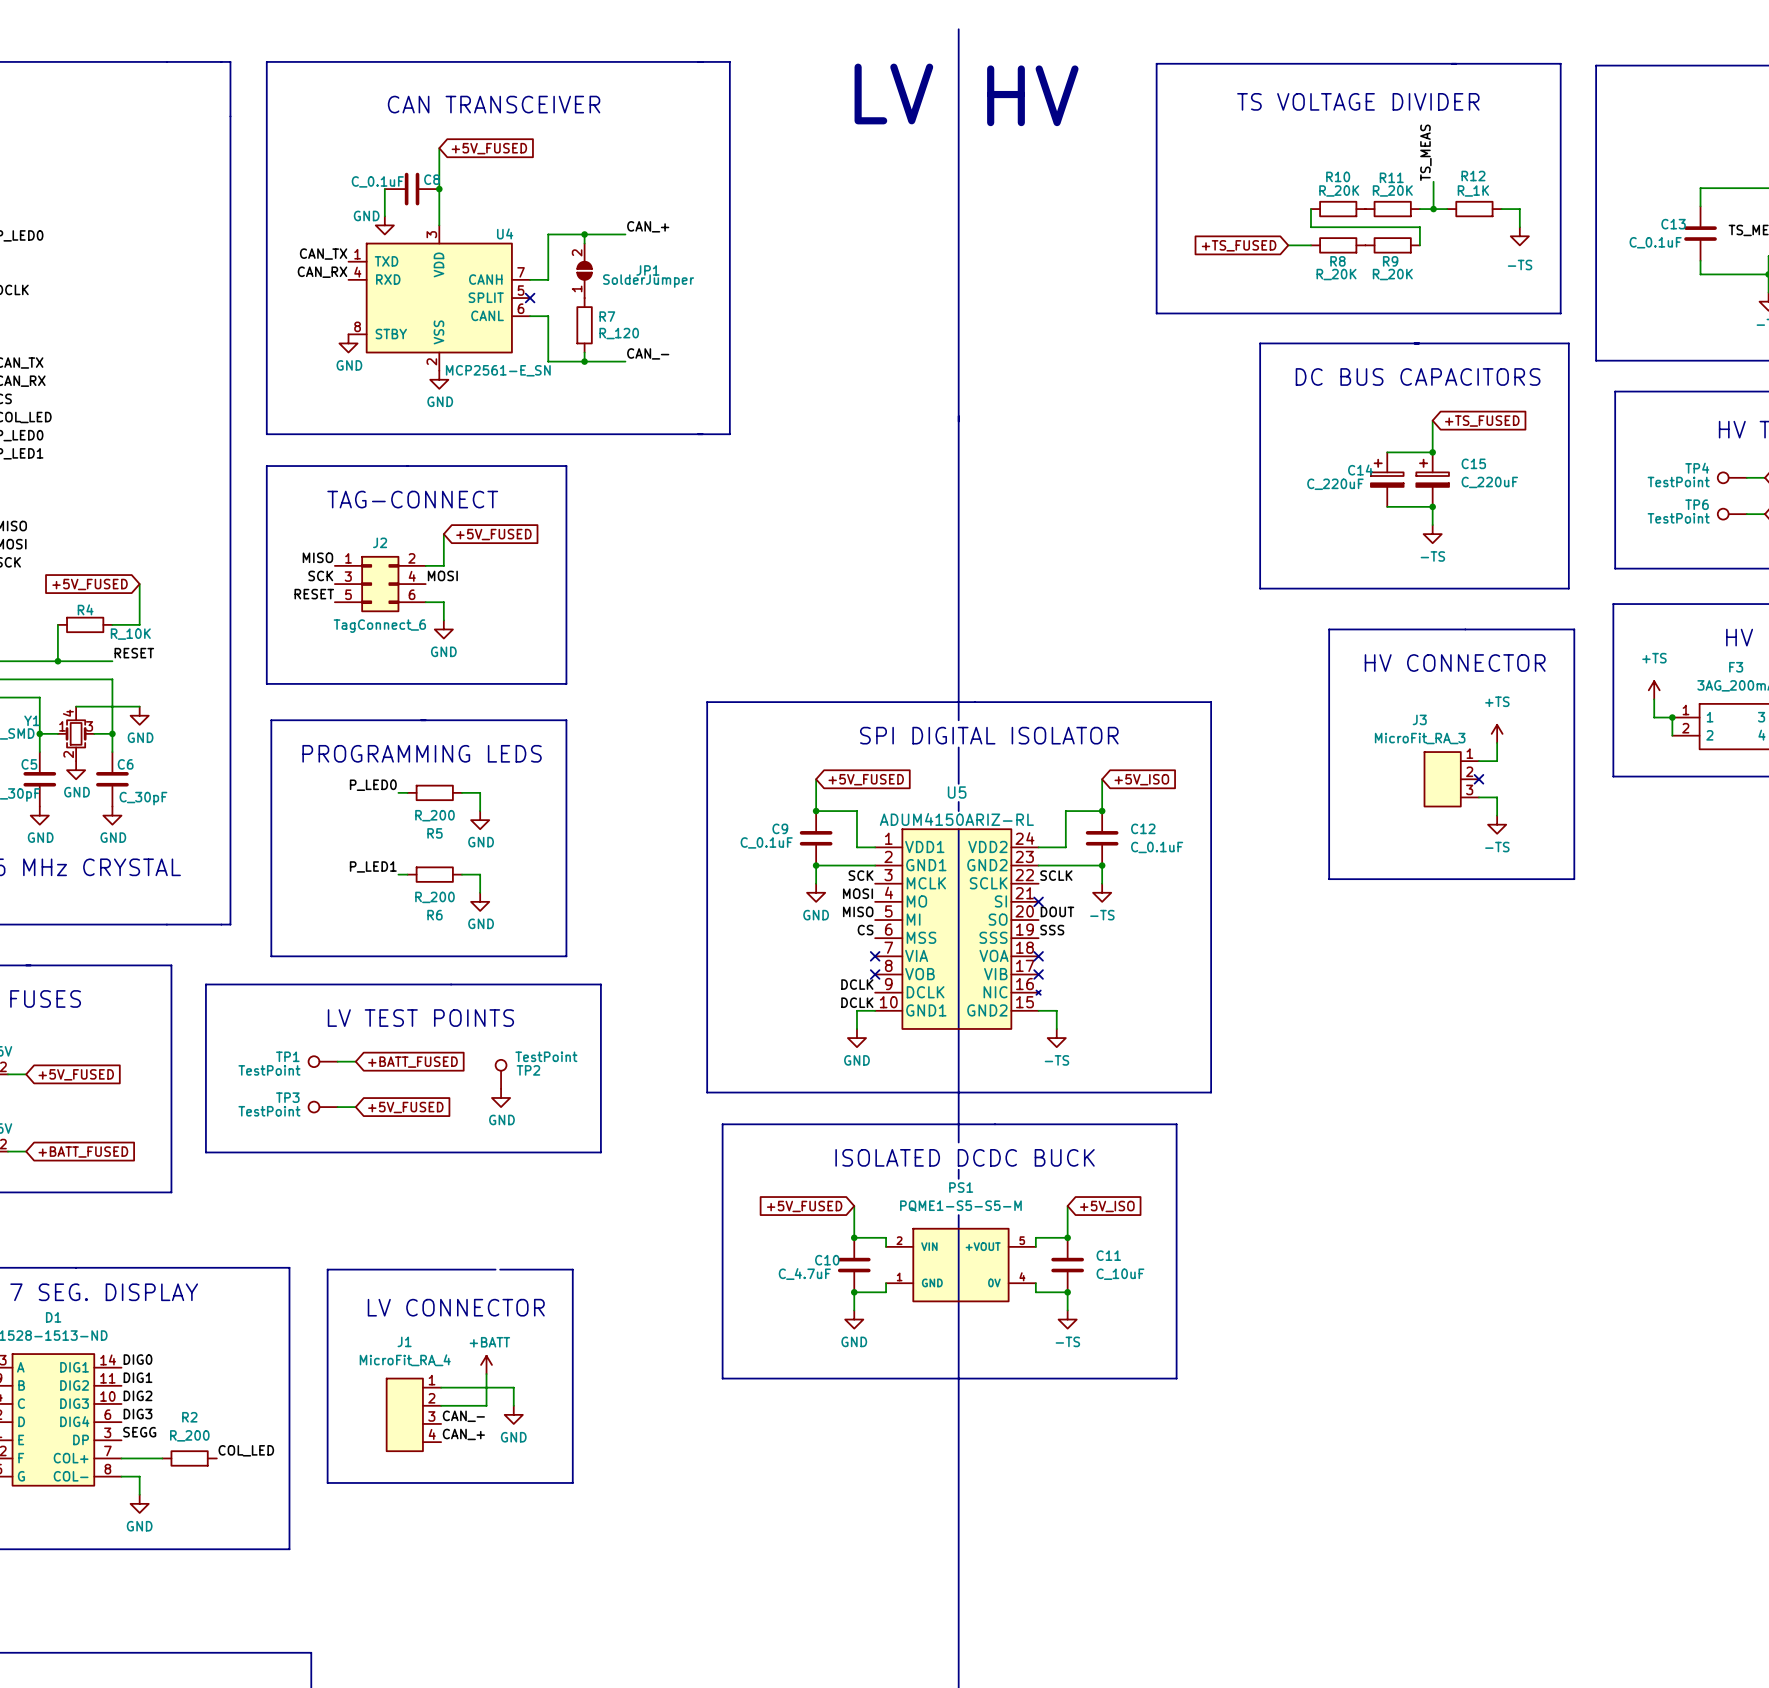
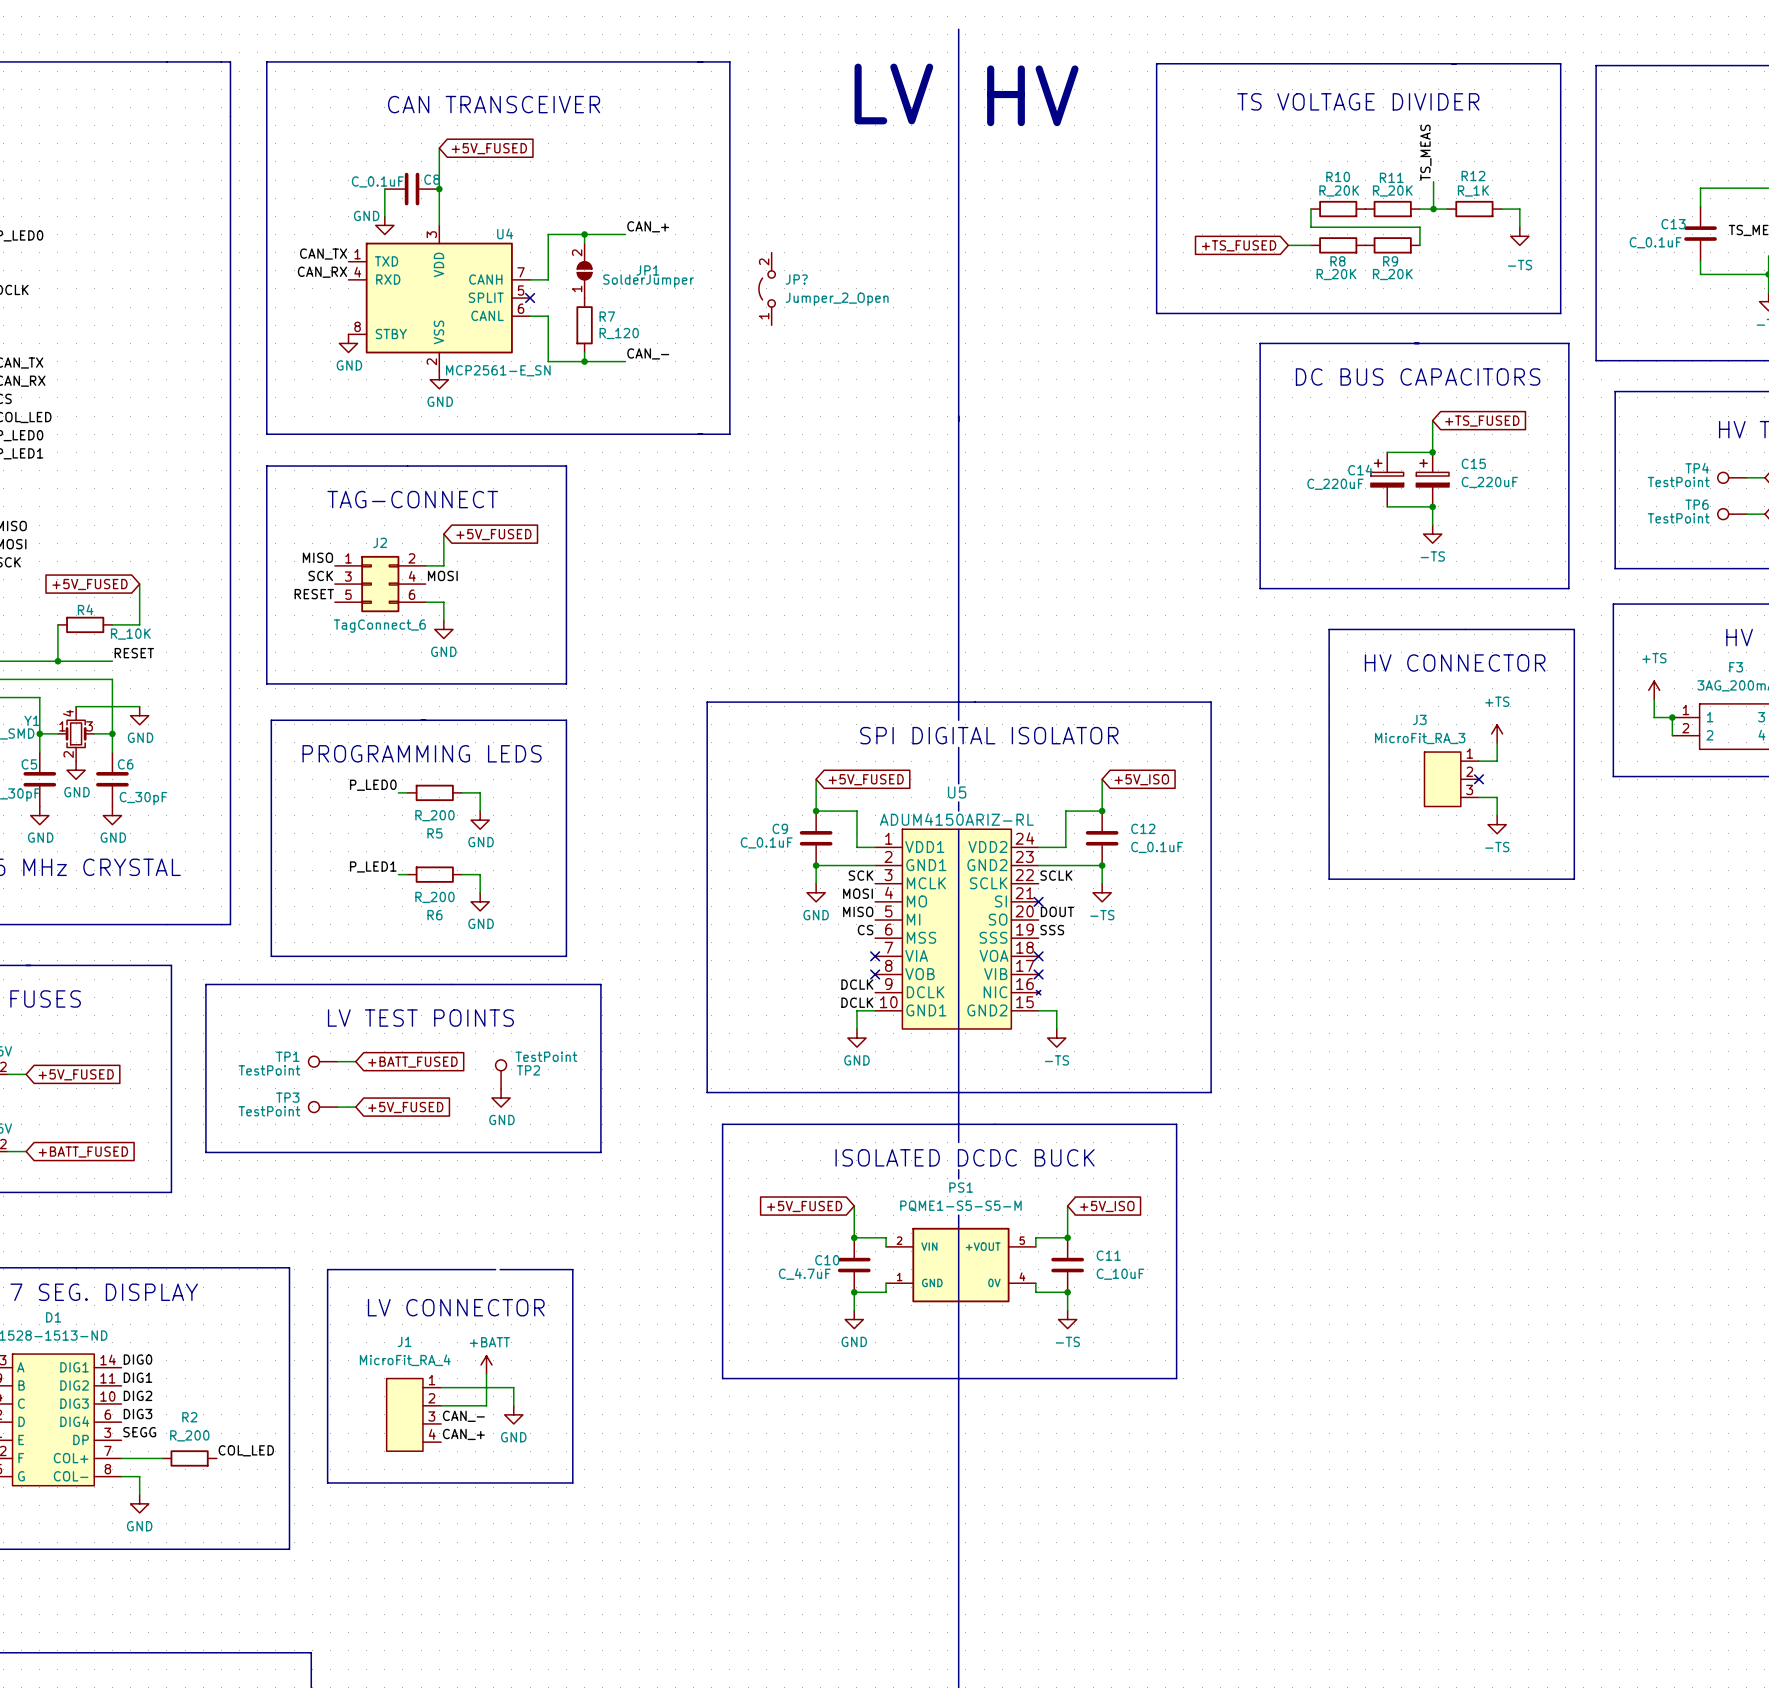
JP?: none -> Jumper_2_Open (767, 288)

